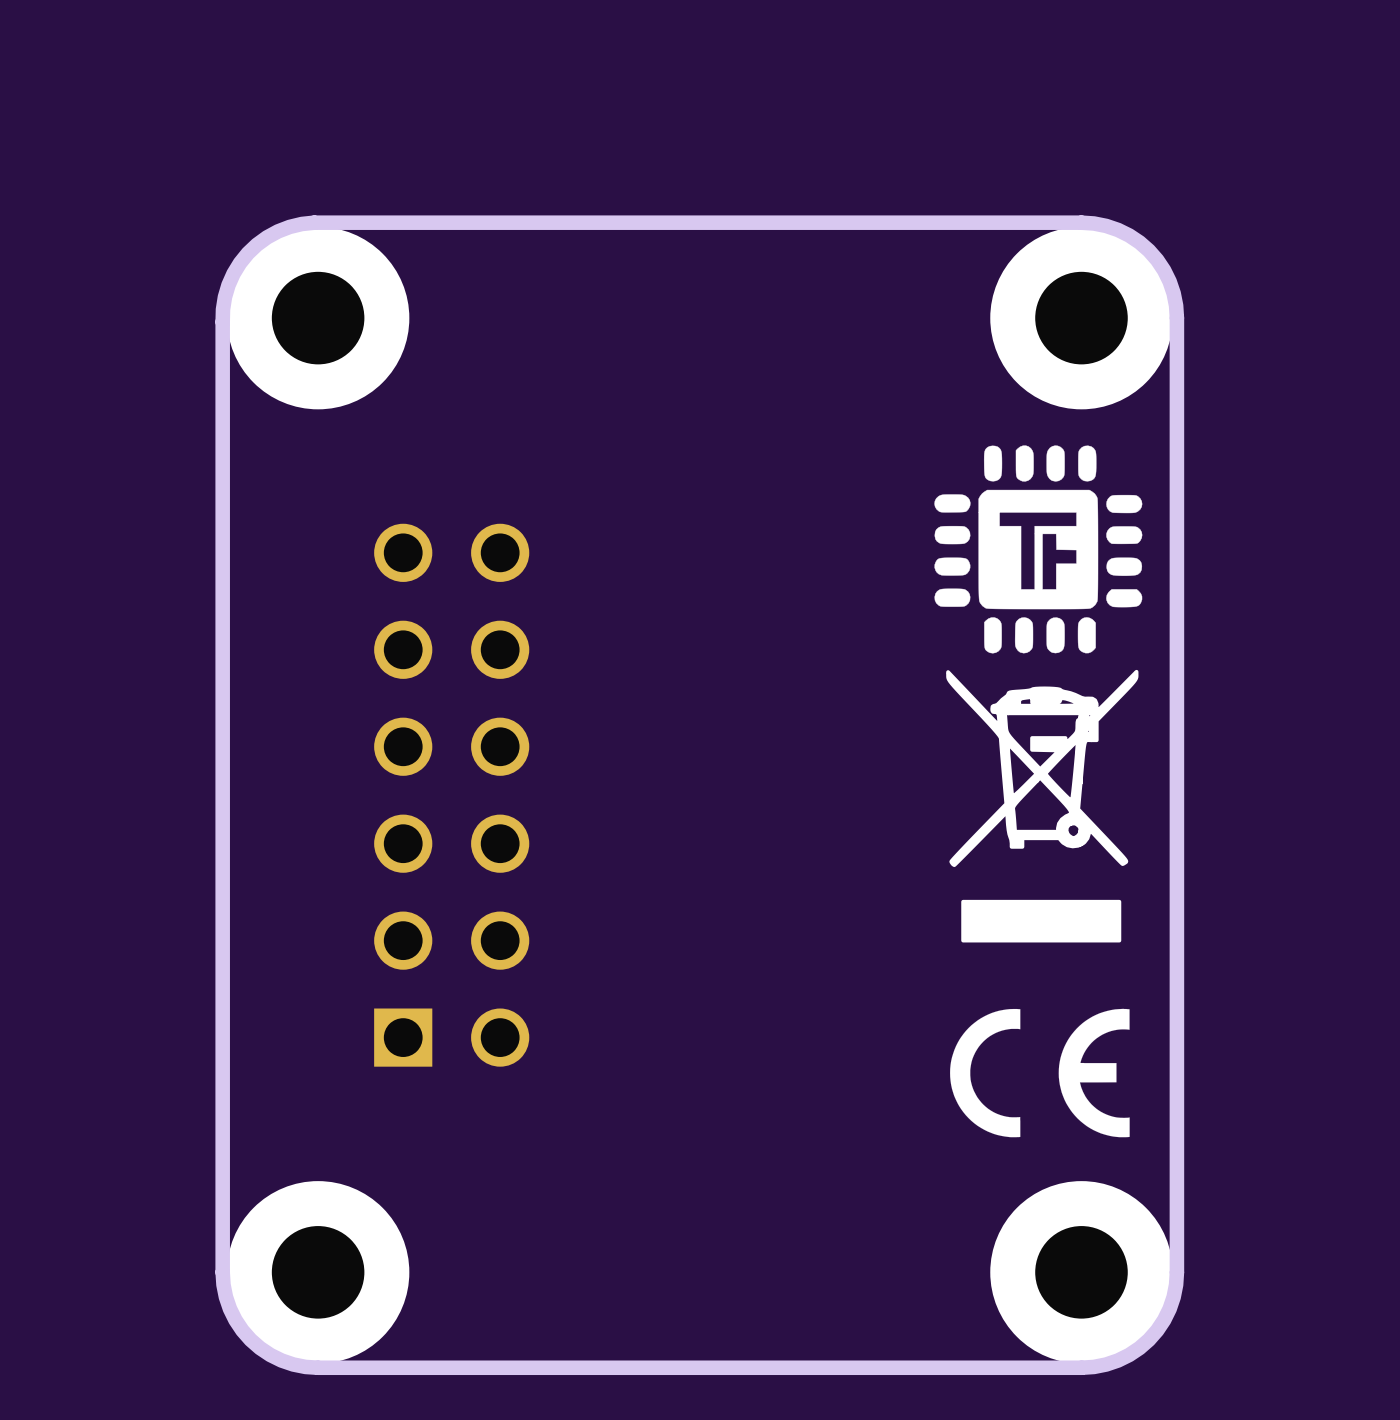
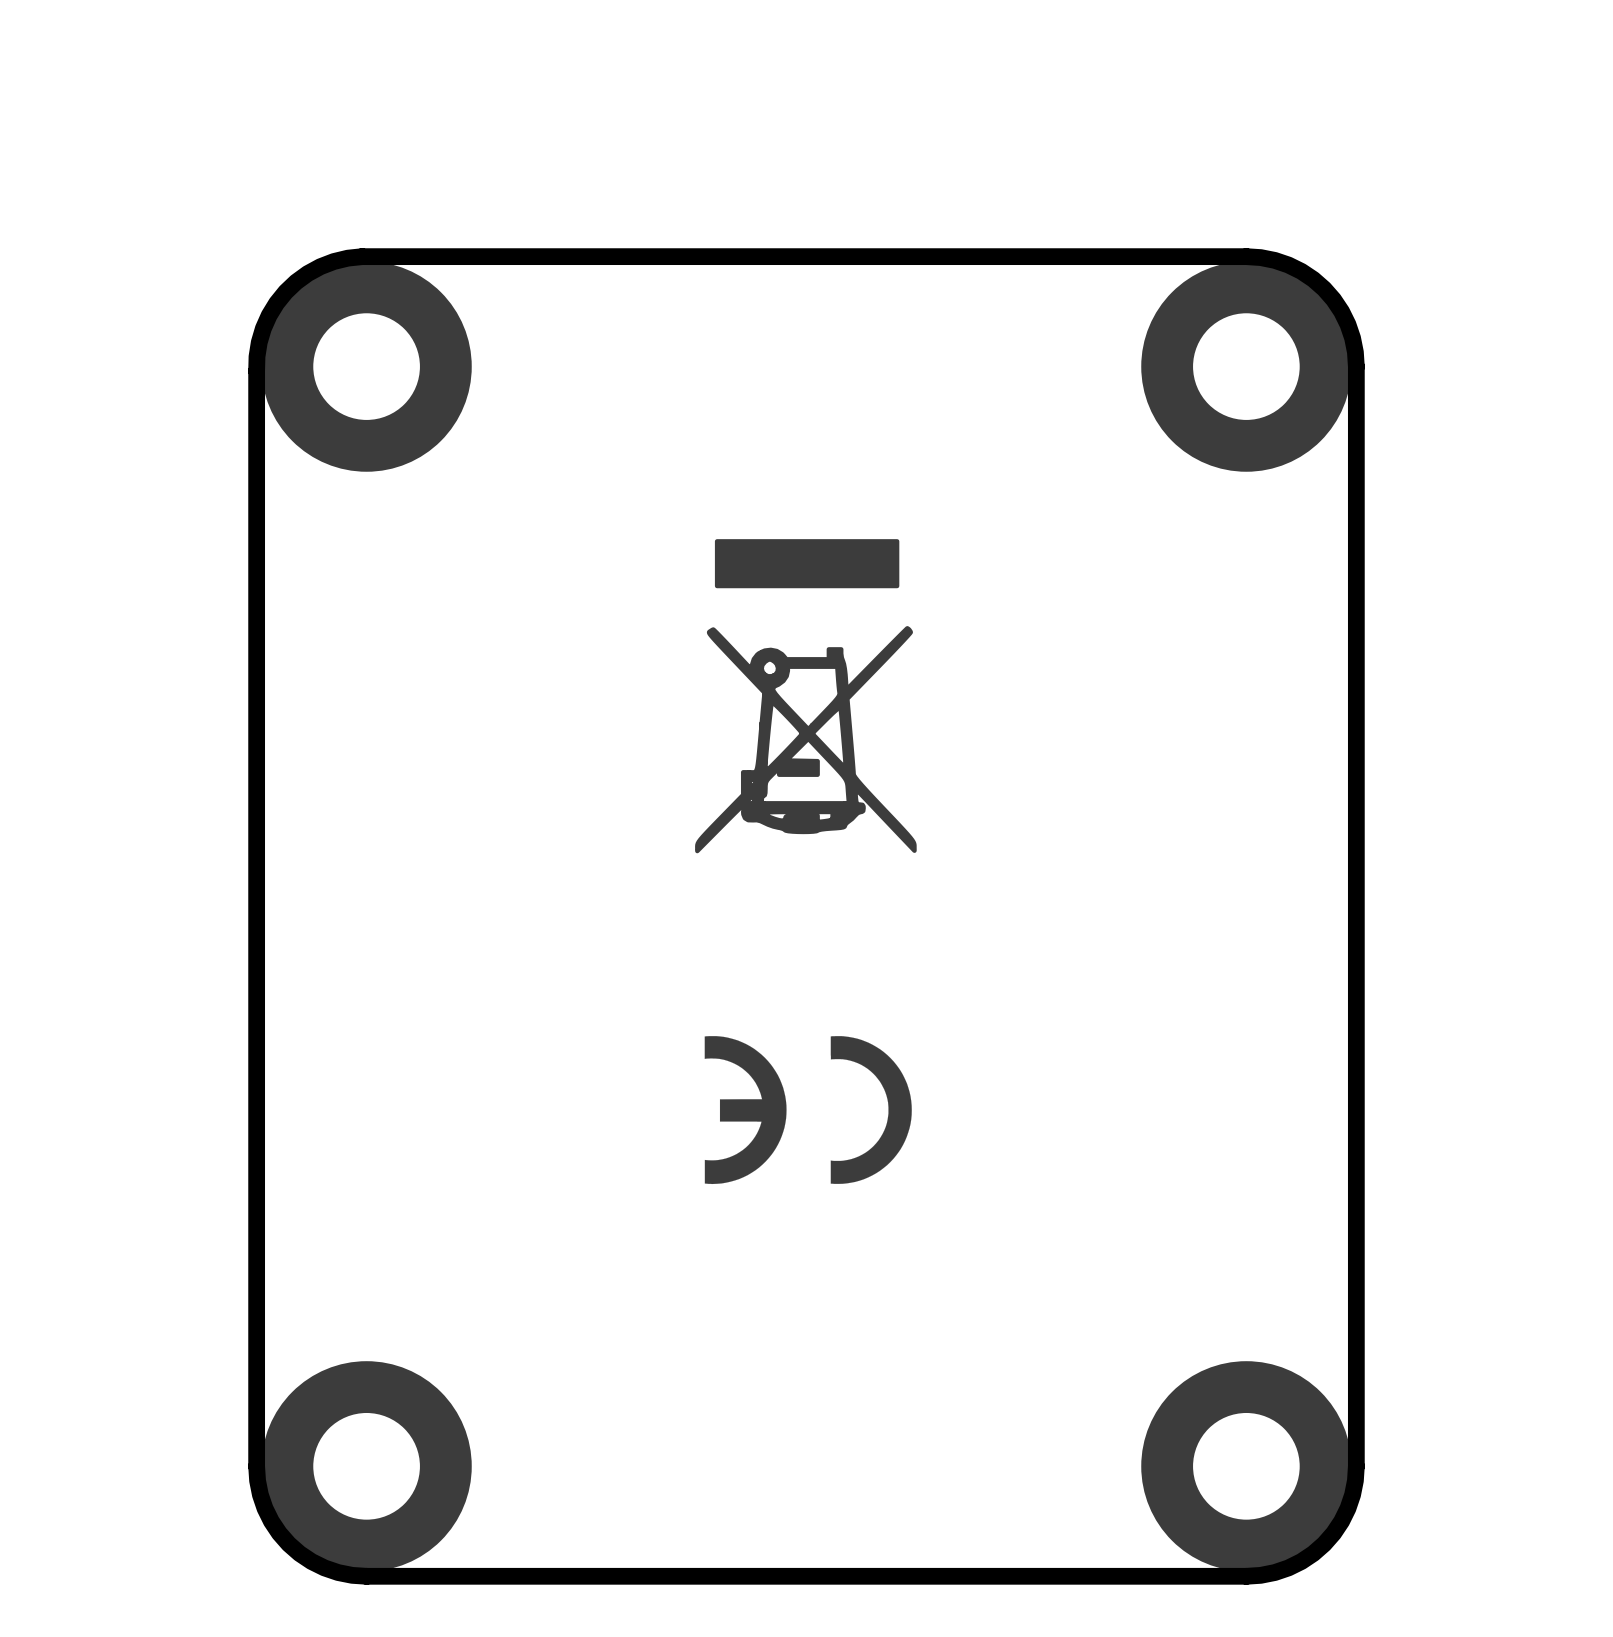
drawing: [934, 445, 1143, 943] -> none
drawing: none -> [695, 539, 917, 854]
part: (451, 795) -> none
drawing: none -> [704, 1036, 912, 1185]
drawing: [950, 1008, 1130, 1138] -> none

